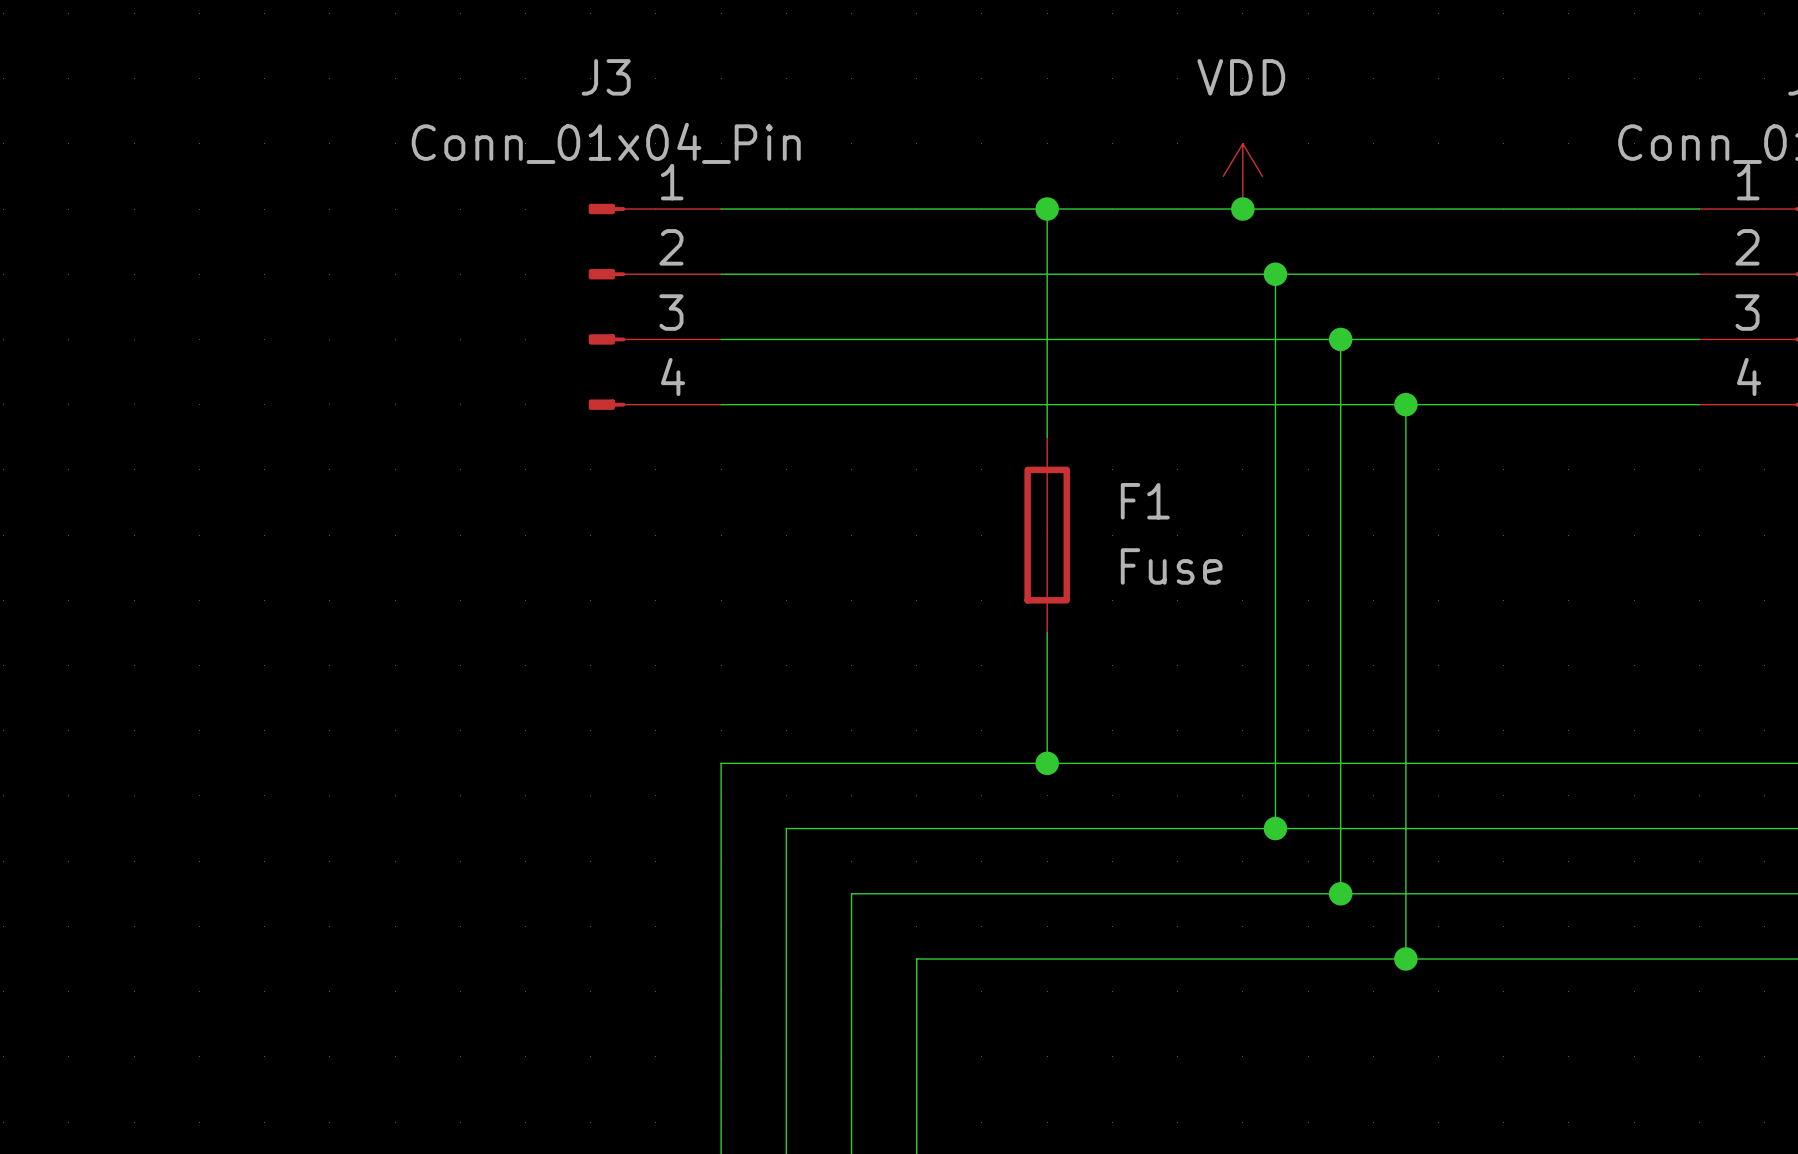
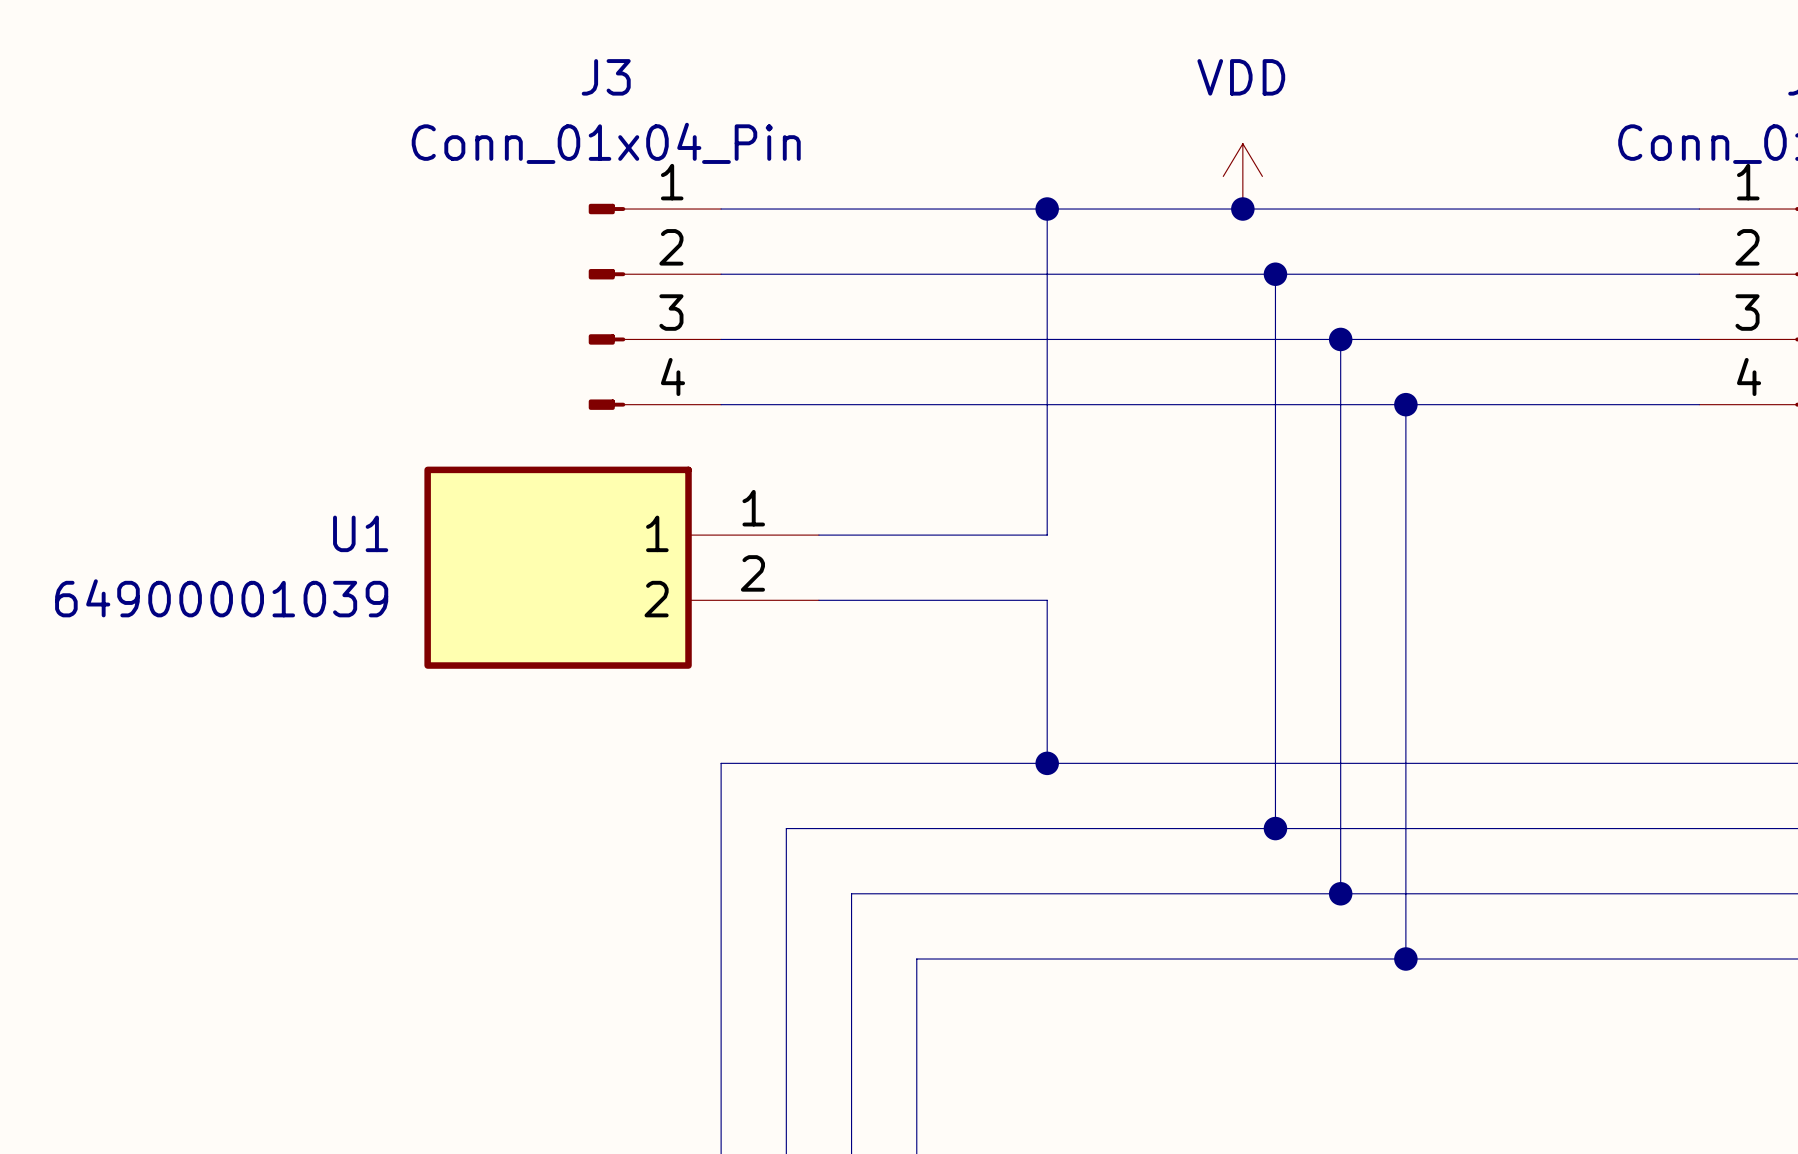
wire: none -> (1047, 437) (1047, 535) (818, 535)
F1: Fuse (1047, 535) -> none
U1: none -> 64900001039 (621, 567)
wire: none -> (818, 600) (1047, 600) (1047, 632)

